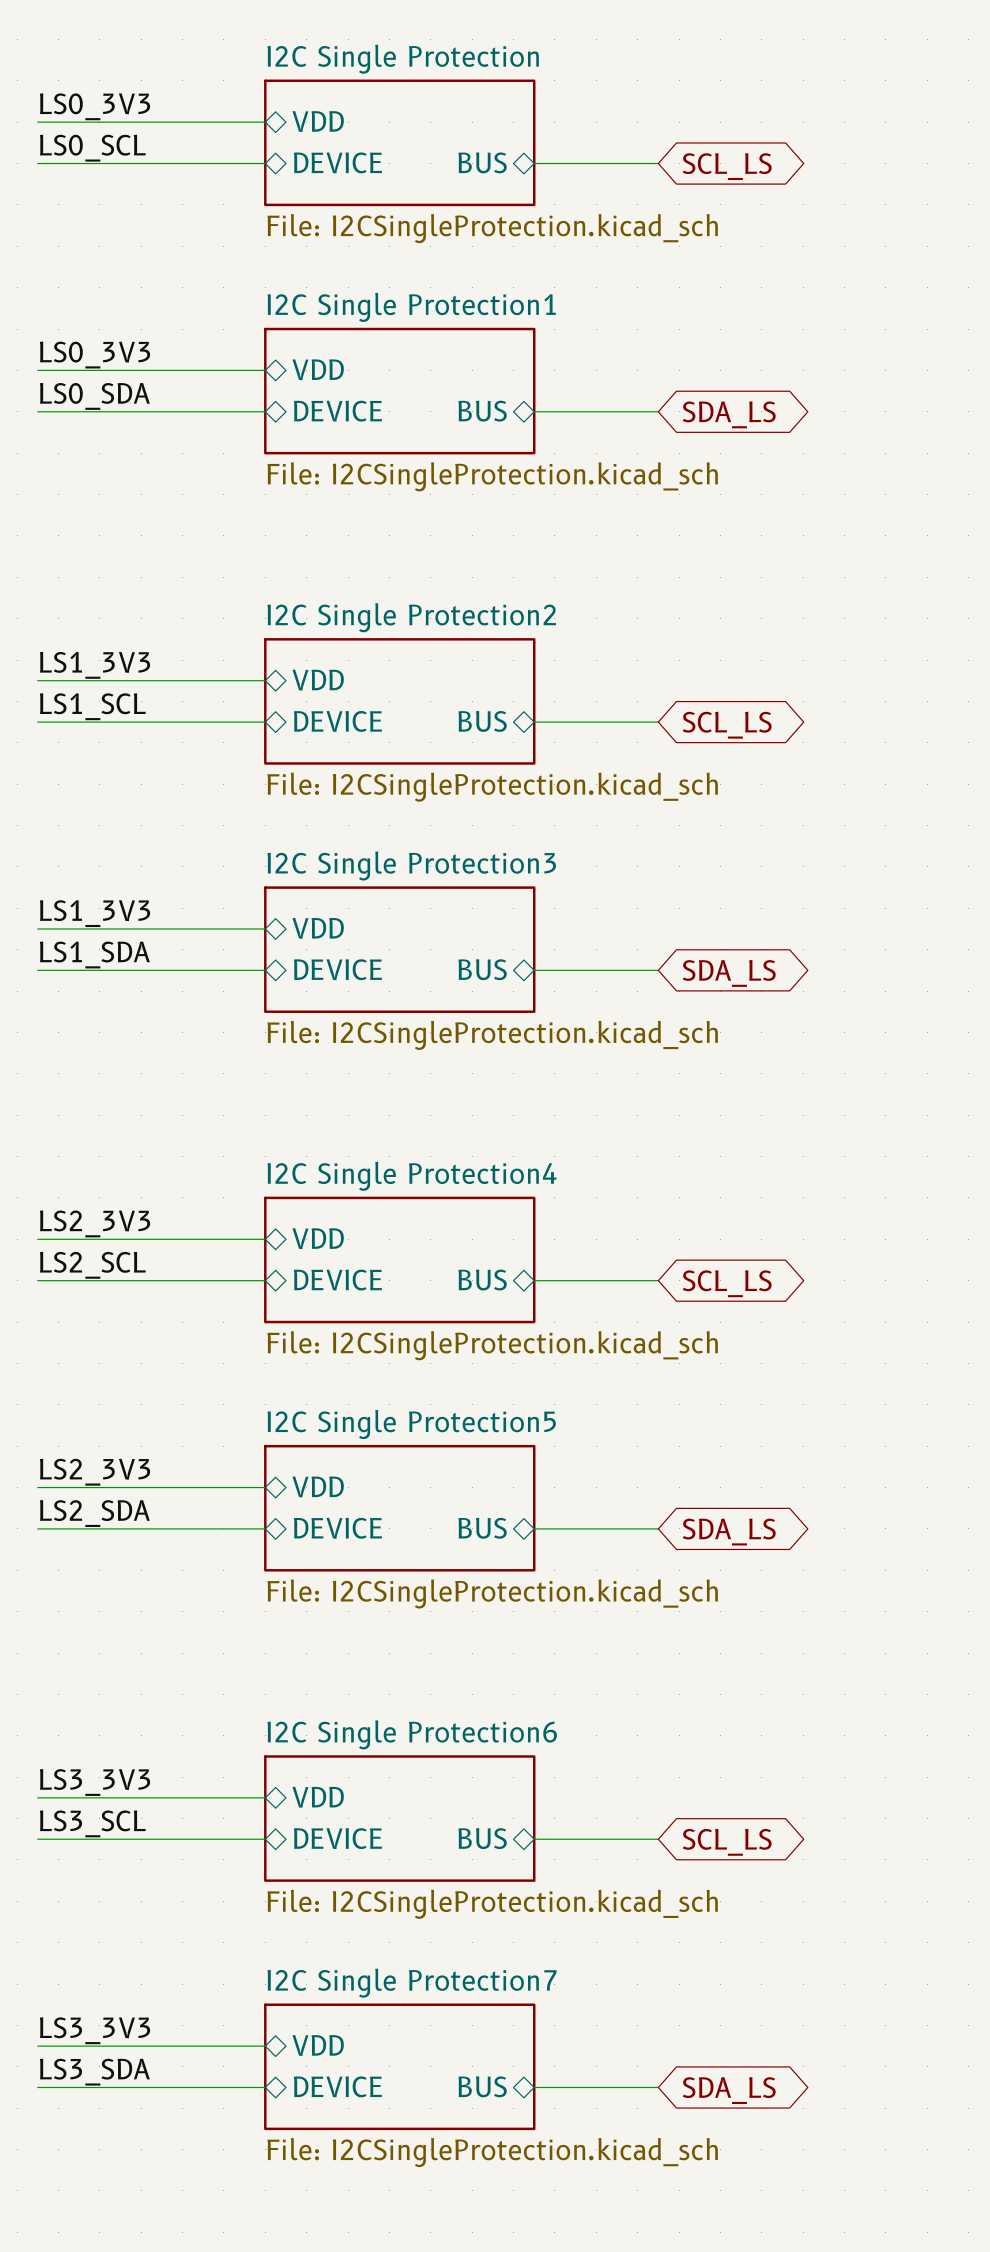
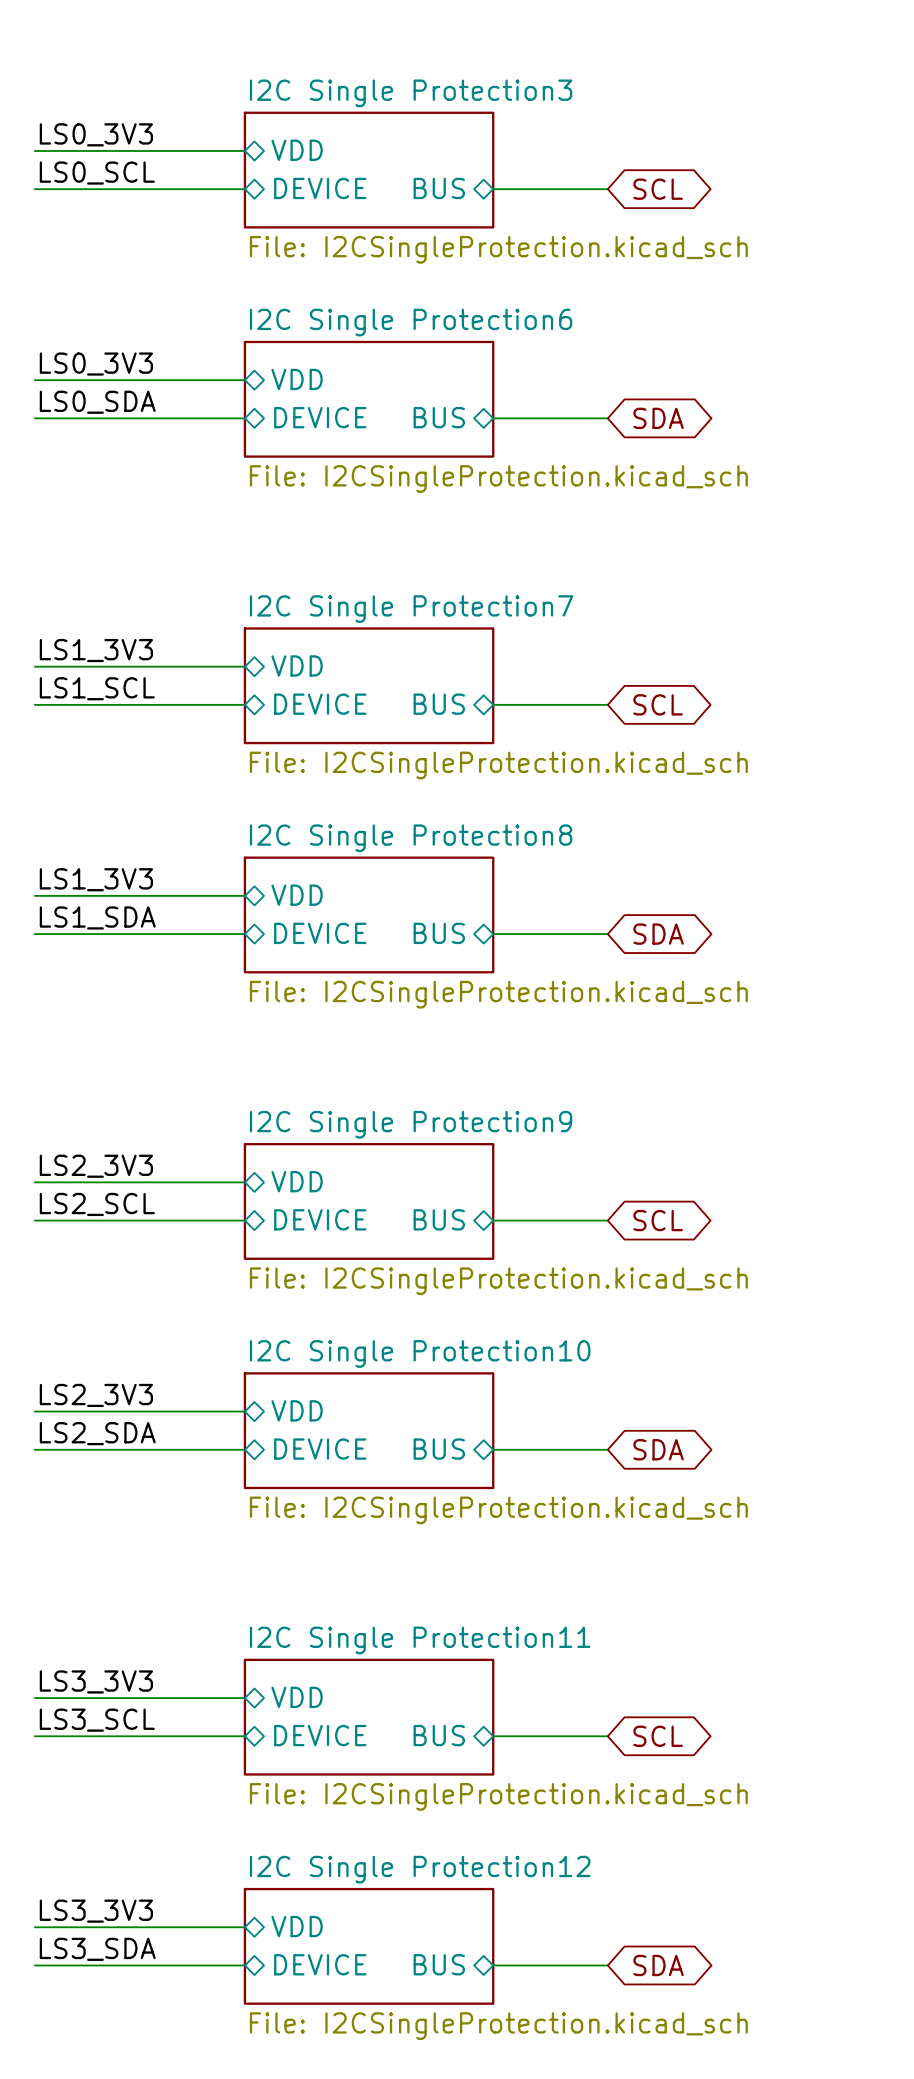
label: LS0_3V3 (95, 106) -> none
sheet pin: VDD (318, 121) -> none
wire: (37, 122) (265, 122) -> (34, 189) (244, 189)
sheet I2C Single Protection: File: I2CSingleProtection.kicad_sch (399, 142) -> none
label: LS0_SCL (92, 148) -> LS0_3V3 (96, 134)
sheet pin: DEVICE (337, 162) -> VDD (297, 150)
sheet pin position: BUS (482, 162) -> BUS (439, 188)
wire: (534, 163) (658, 163) -> (493, 189) (607, 189)
global label: SCL_LS (727, 166) -> SCL (658, 189)
label: none -> LS0_SCL (97, 173)
sheet pin: none -> DEVICE (320, 188)
label: LS0_3V3 (95, 355) -> none
sheet pin: VDD (318, 369) -> none
wire: (37, 370) (265, 370) -> (34, 418) (244, 418)
sheet I2C Single Protection1: File: I2CSingleProtection.kicad_sch (399, 391) -> none
label: LS0_SDA (94, 396) -> LS0_3V3 (96, 364)
sheet pin: DEVICE (337, 411) -> VDD (297, 379)
sheet pin position: BUS (482, 411) -> BUS (439, 417)
wire: (534, 411) (658, 411) -> (493, 418) (607, 418)
global label: SDA_LS (729, 414) -> SDA (658, 418)
label: none -> LS0_SDA (97, 402)
sheet pin: none -> DEVICE (320, 417)
label: LS1_3V3 (95, 665) -> none
wire: (37, 680) (265, 680) -> (34, 704) (244, 704)
sheet pin: VDD (318, 680) -> none
sheet I2C Single Protection2: File: I2CSingleProtection.kicad_sch (399, 701) -> none
label: LS1_SCL (92, 706) -> LS1_3V3 (96, 650)
sheet pin: DEVICE (337, 721) -> VDD (297, 665)
sheet pin position: BUS (482, 721) -> BUS (439, 704)
wire: (534, 722) (658, 722) -> (493, 704) (607, 704)
global label: SCL_LS (727, 725) -> SCL (658, 704)
label: none -> LS1_SCL (97, 688)
sheet pin: none -> DEVICE (320, 704)
label: LS1_3V3 (95, 913) -> none
wire: (37, 928) (265, 928) -> (34, 934) (244, 934)
sheet pin: VDD (318, 928) -> none
sheet I2C Single Protection3 position: (399, 949) -> (369, 170)
label: LS1_SDA (94, 954) -> LS1_3V3 (96, 879)
sheet pin: DEVICE (337, 969) -> VDD (297, 895)
sheet pin position: BUS (482, 969) -> BUS (439, 933)
wire: (534, 970) (658, 970) -> (493, 934) (607, 934)
global label: SDA_LS (729, 973) -> SDA (658, 934)
sheet I2C Single Protection8: none -> File: I2CSingleProtection.kicad_sch (369, 914)
label: none -> LS1_SDA (97, 917)
sheet pin: none -> DEVICE (320, 933)
label: LS2_3V3 (95, 1223) -> none
sheet pin: VDD (318, 1238) -> none
wire: (37, 1239) (265, 1239) -> (34, 1220) (244, 1220)
sheet I2C Single Protection4: File: I2CSingleProtection.kicad_sch (399, 1259) -> none
label: LS2_SCL (92, 1265) -> LS2_3V3 (96, 1166)
sheet pin: DEVICE (337, 1280) -> VDD (297, 1181)
sheet pin position: BUS (482, 1280) -> BUS (439, 1219)
wire: (534, 1280) (658, 1280) -> (493, 1220) (607, 1220)
global label: SCL_LS (727, 1283) -> SCL (658, 1220)
sheet I2C Single Protection9: none -> File: I2CSingleProtection.kicad_sch (369, 1201)
label: none -> LS2_SCL (97, 1204)
sheet pin: none -> DEVICE (320, 1219)
label: LS2_3V3 (95, 1472) -> none
sheet pin: VDD (318, 1486) -> none
wire: (37, 1487) (265, 1487) -> (34, 1449) (244, 1449)
sheet I2C Single Protection5: File: I2CSingleProtection.kicad_sch (399, 1508) -> none
label: LS2_SDA (94, 1513) -> LS2_3V3 (96, 1395)
sheet pin: DEVICE (337, 1528) -> VDD (297, 1410)
sheet pin position: BUS (482, 1528) -> BUS (439, 1449)
wire: (534, 1528) (658, 1528) -> (493, 1449) (607, 1449)
global label: SDA_LS (729, 1532) -> SDA (658, 1449)
sheet I2C Single Protection10: none -> File: I2CSingleProtection.kicad_sch (369, 1430)
label: none -> LS2_SDA (97, 1433)
sheet pin: none -> DEVICE (320, 1449)
label: LS3_3V3 (95, 1782) -> none
wire: (37, 1797) (265, 1797) -> (34, 1736) (244, 1736)
sheet pin: VDD (318, 1797) -> none
sheet I2C Single Protection6 position: (399, 1818) -> (369, 399)
label: LS3_SCL (92, 1823) -> LS3_3V3 (96, 1681)
sheet pin: DEVICE (337, 1838) -> VDD (297, 1697)
sheet pin position: BUS (482, 1838) -> BUS (439, 1735)
wire: (534, 1839) (658, 1839) -> (493, 1736) (607, 1736)
global label: SCL_LS (727, 1842) -> SCL (658, 1736)
sheet I2C Single Protection11: none -> File: I2CSingleProtection.kicad_sch (369, 1717)
label: none -> LS3_SCL (97, 1720)
sheet pin: none -> DEVICE (320, 1735)
label: LS3_3V3 (95, 2030) -> none
sheet pin: VDD (318, 2045) -> none
wire: (37, 2046) (265, 2046) -> (34, 1965) (244, 1965)
sheet I2C Single Protection7 position: (399, 2066) -> (369, 685)
label: LS3_SDA (94, 2072) -> LS3_3V3 (96, 1911)
sheet pin: DEVICE (337, 2086) -> VDD (297, 1926)
sheet pin position: BUS (482, 2086) -> BUS (439, 1964)
wire: (534, 2087) (658, 2087) -> (493, 1965) (607, 1965)
global label: SDA_LS (729, 2090) -> SDA (658, 1965)
sheet I2C Single Protection12: none -> File: I2CSingleProtection.kicad_sch (369, 1946)
label: none -> LS3_SDA (97, 1949)
sheet pin: none -> DEVICE (320, 1964)

